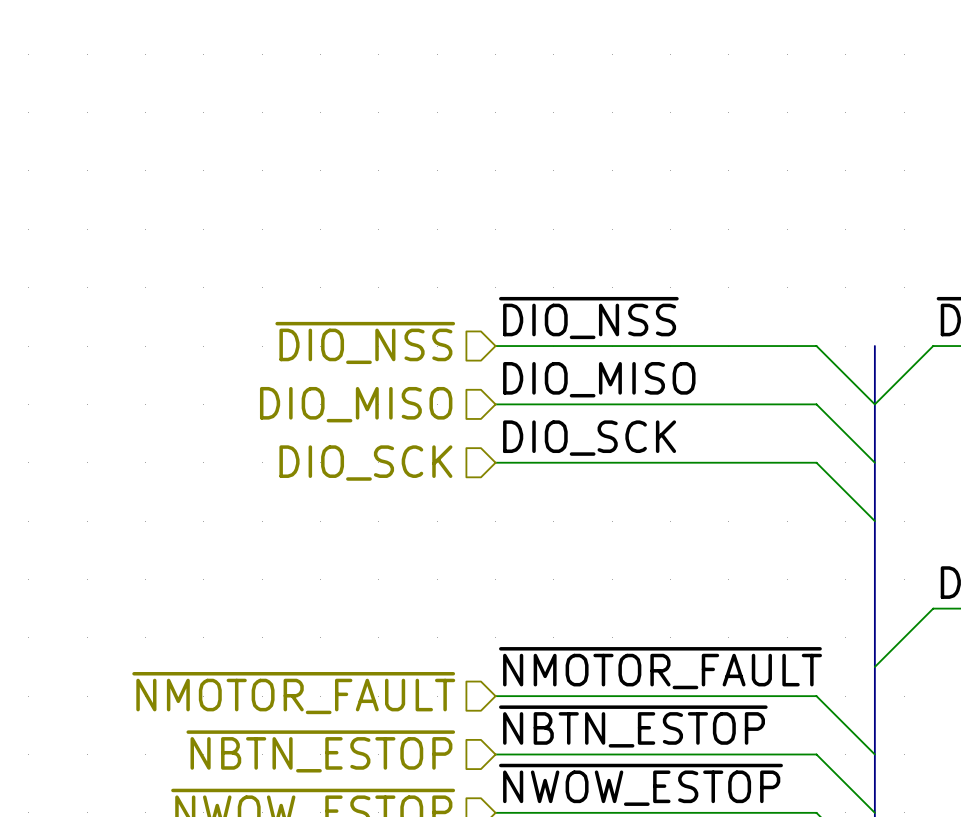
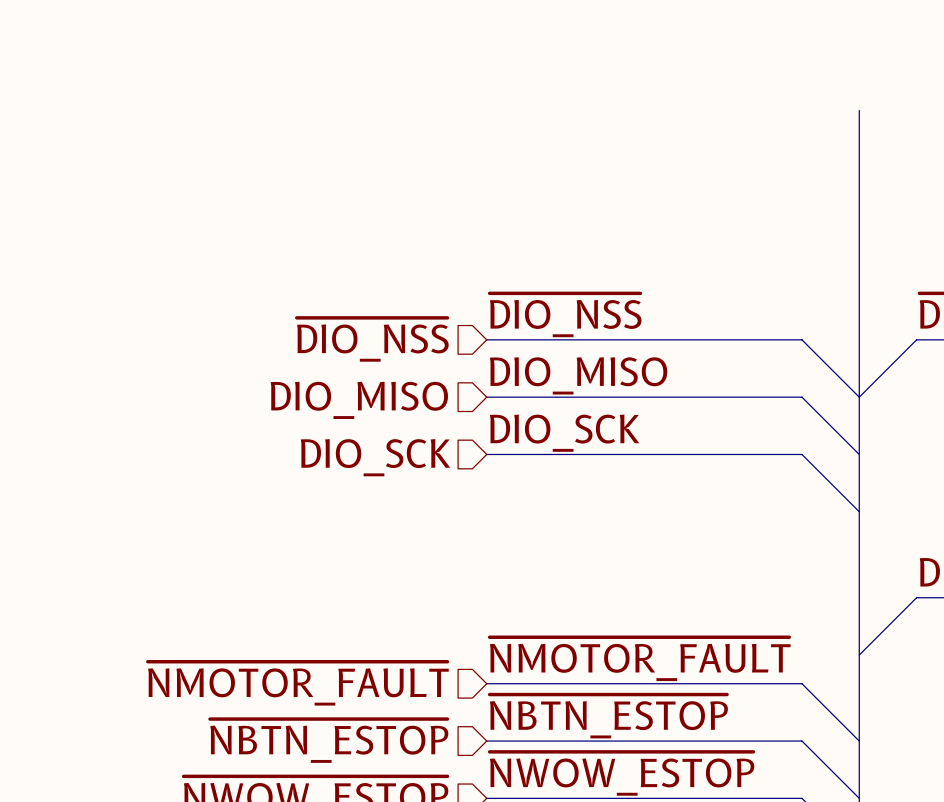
bus: none -> (859, 110) (859, 339)

